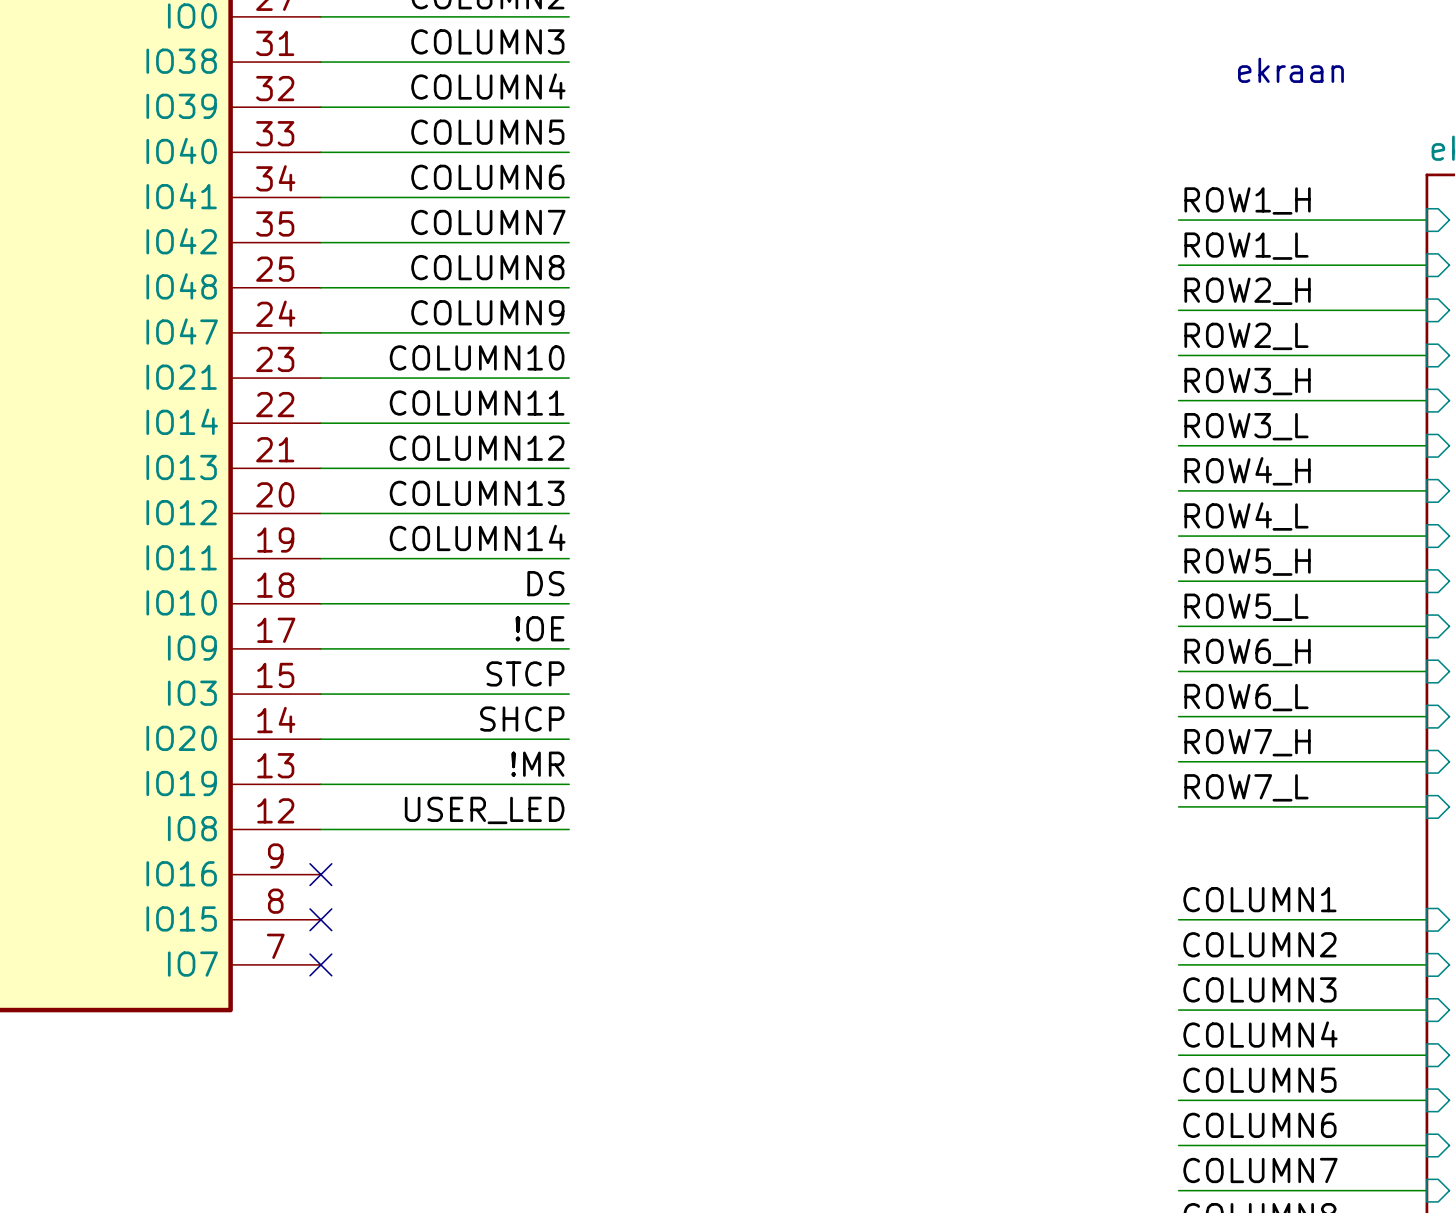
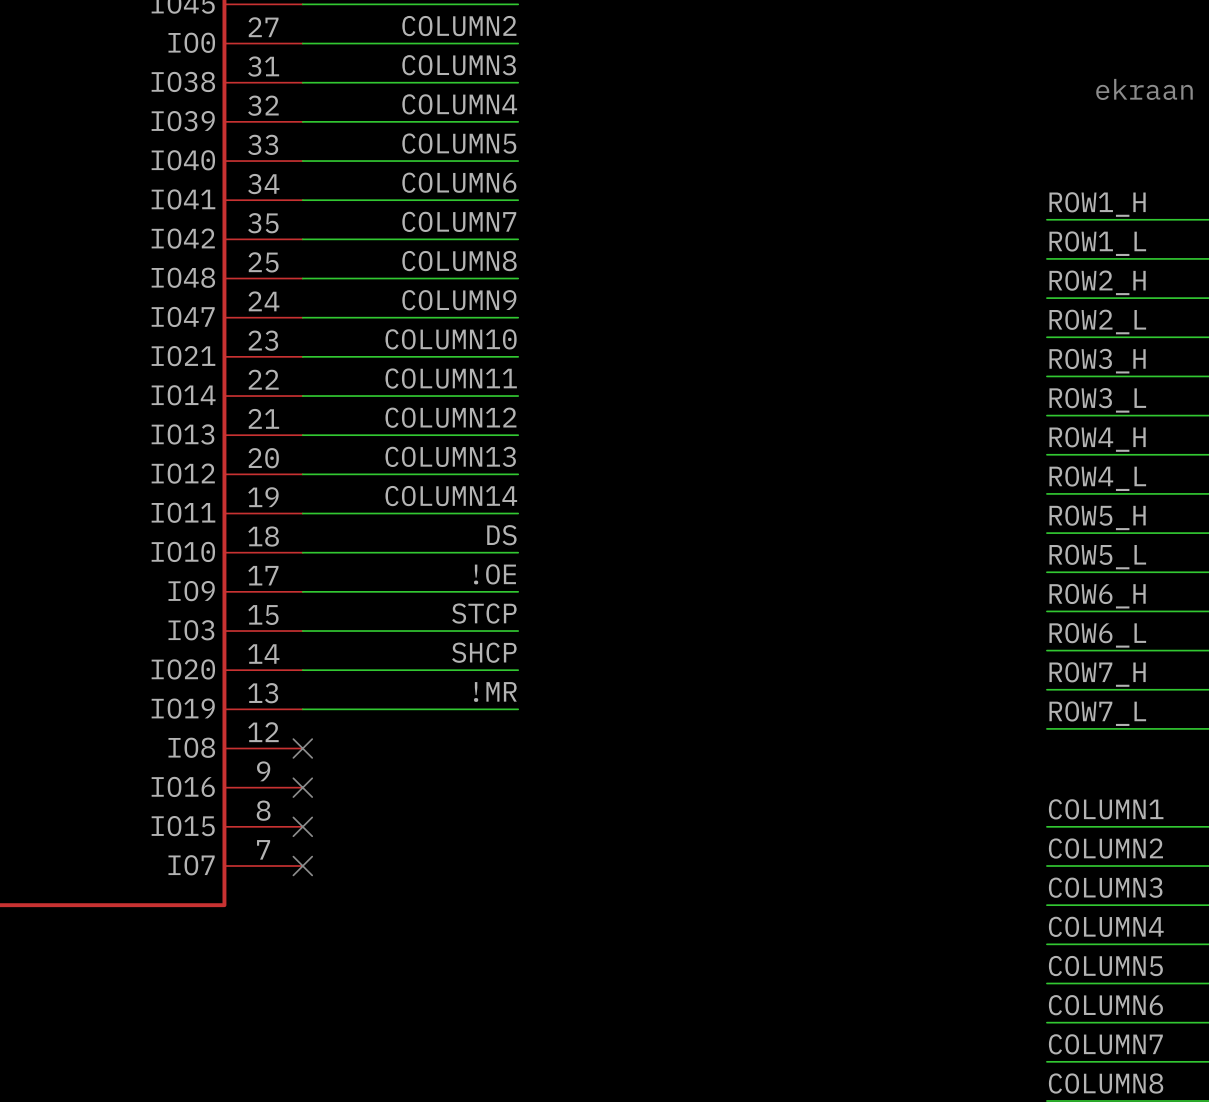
label: USER_LED (484, 810) -> none
wire: (320, 829) (569, 829) -> none
no-connect mark: none -> (302, 748)

